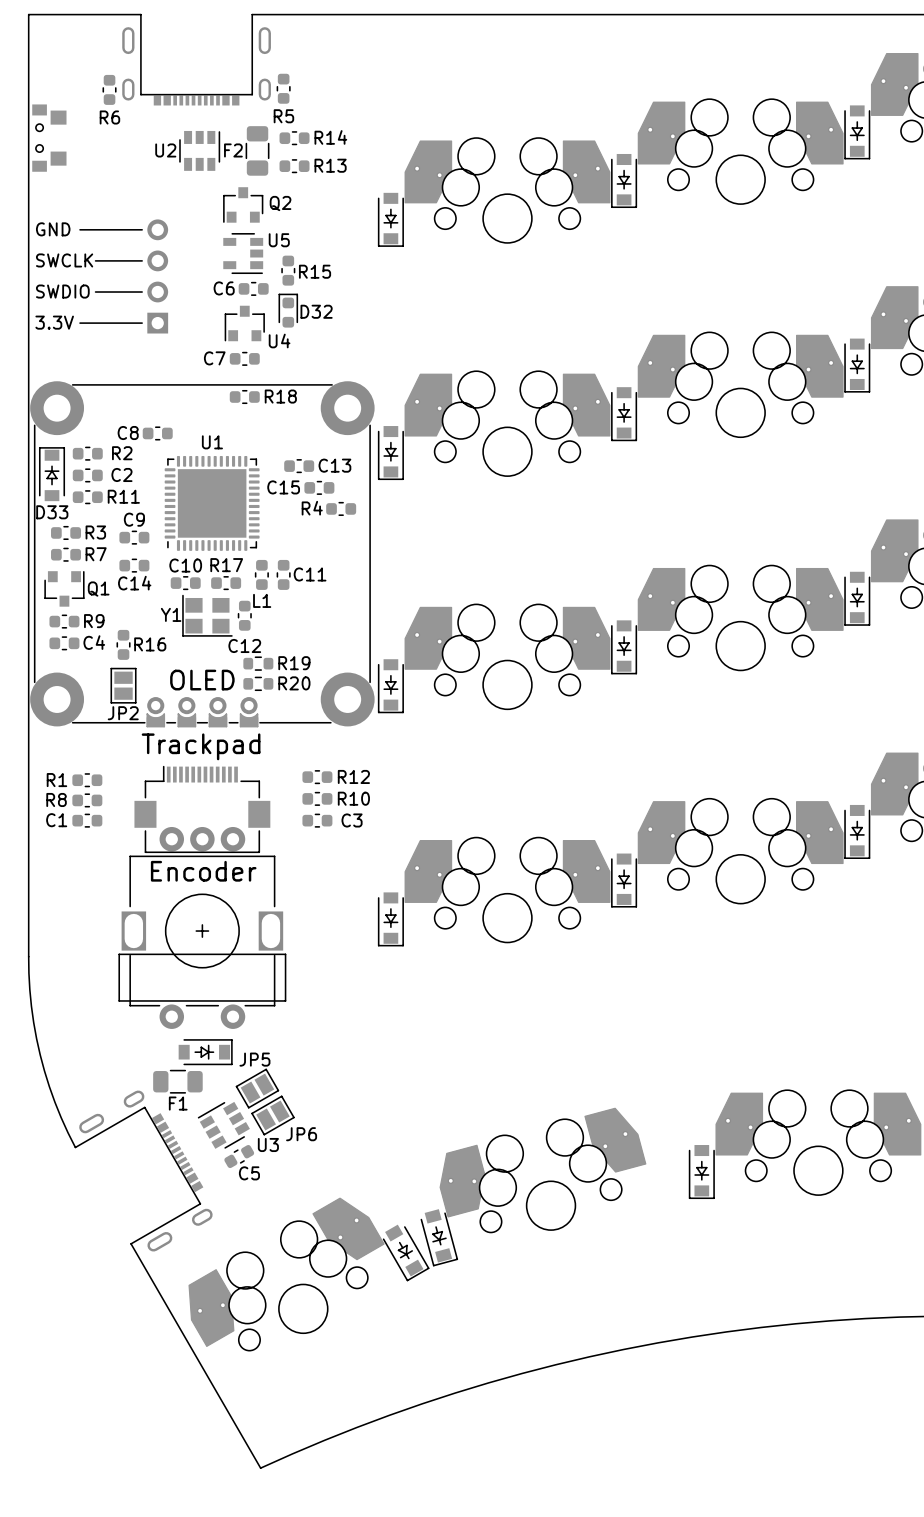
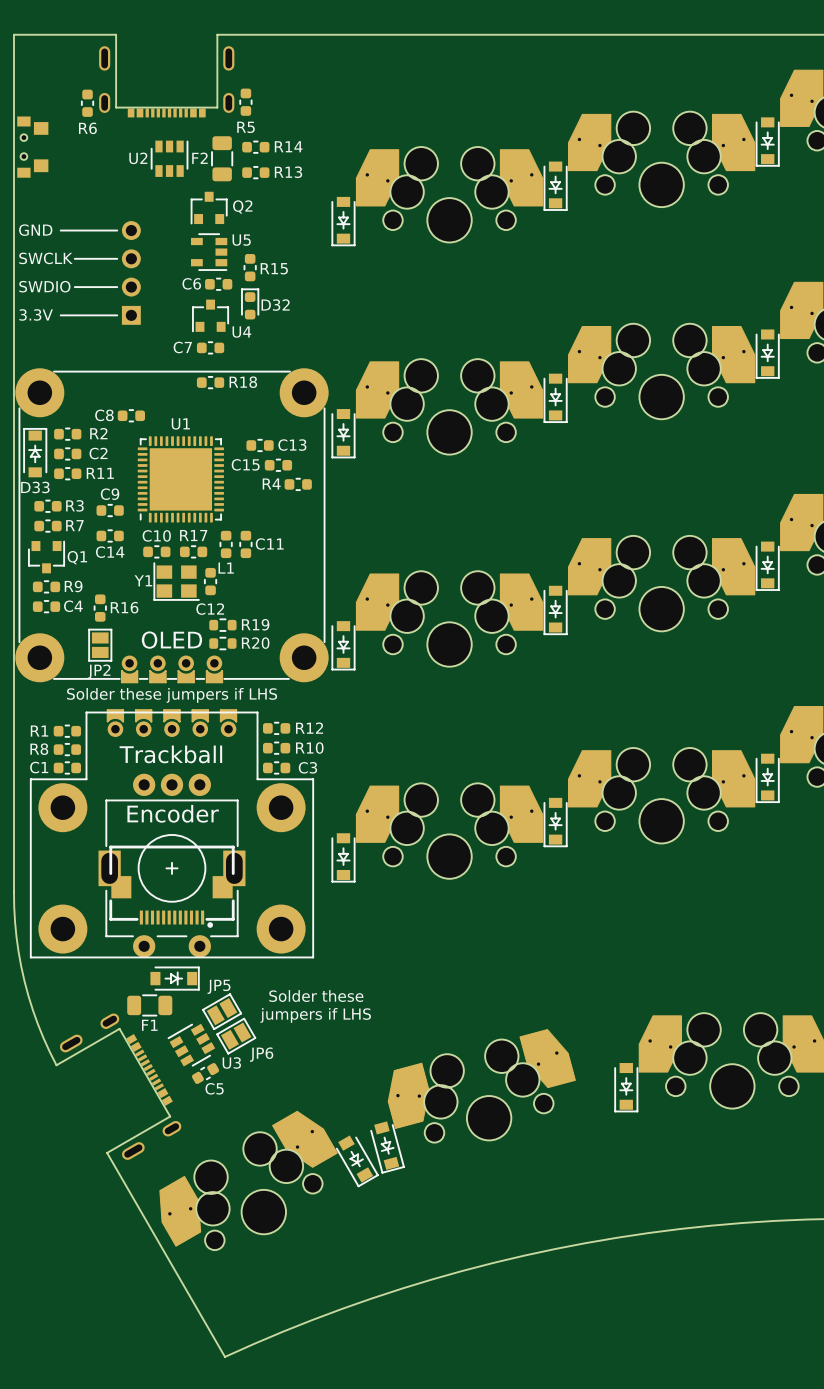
text: Trackpad (201, 746) -> Solder these jumpers if LHS (172, 695)
text: none -> Trackball (170, 754)
part: (202, 809) -> none
part: none -> (172, 833)
part: none -> (172, 886)
board edge: (285, 954) (119, 954) (119, 1000) (285, 1000) (285, 954) -> none
text: none -> Solder these (316, 996)
text: none -> jumpers if LHS (315, 1015)

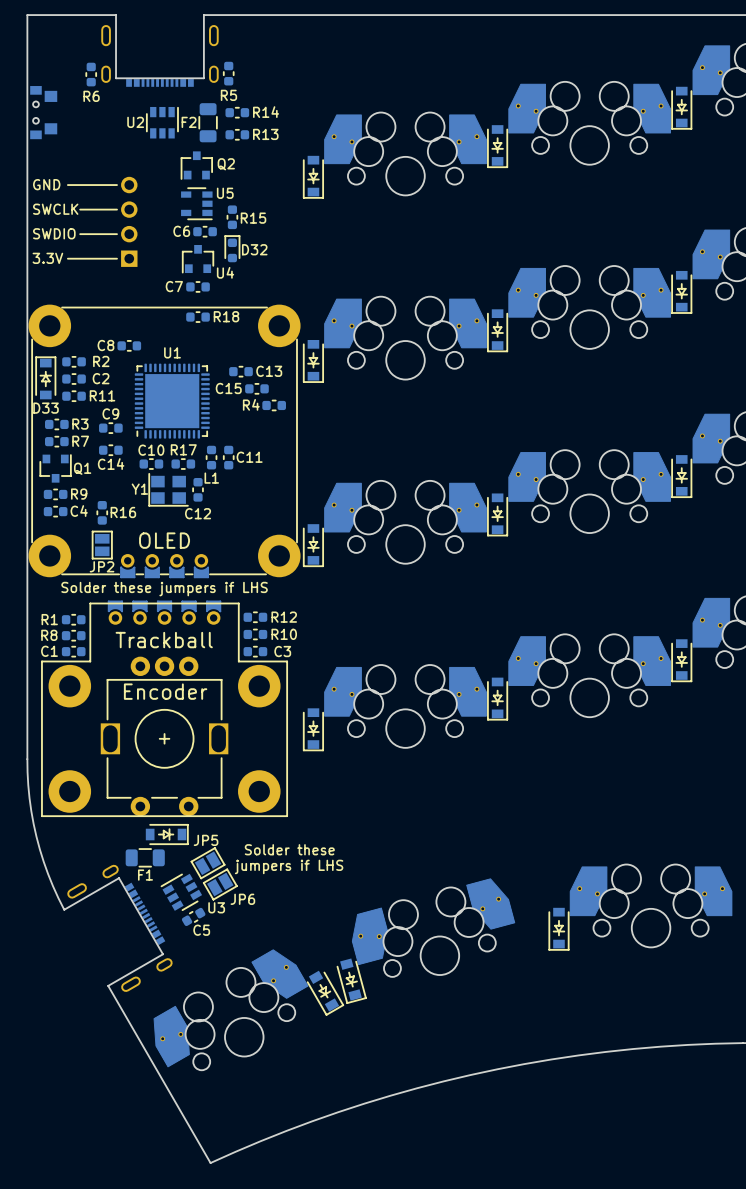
R19: (222, 625) -> none
R20: (222, 643) -> none
part: (172, 886) -> none

